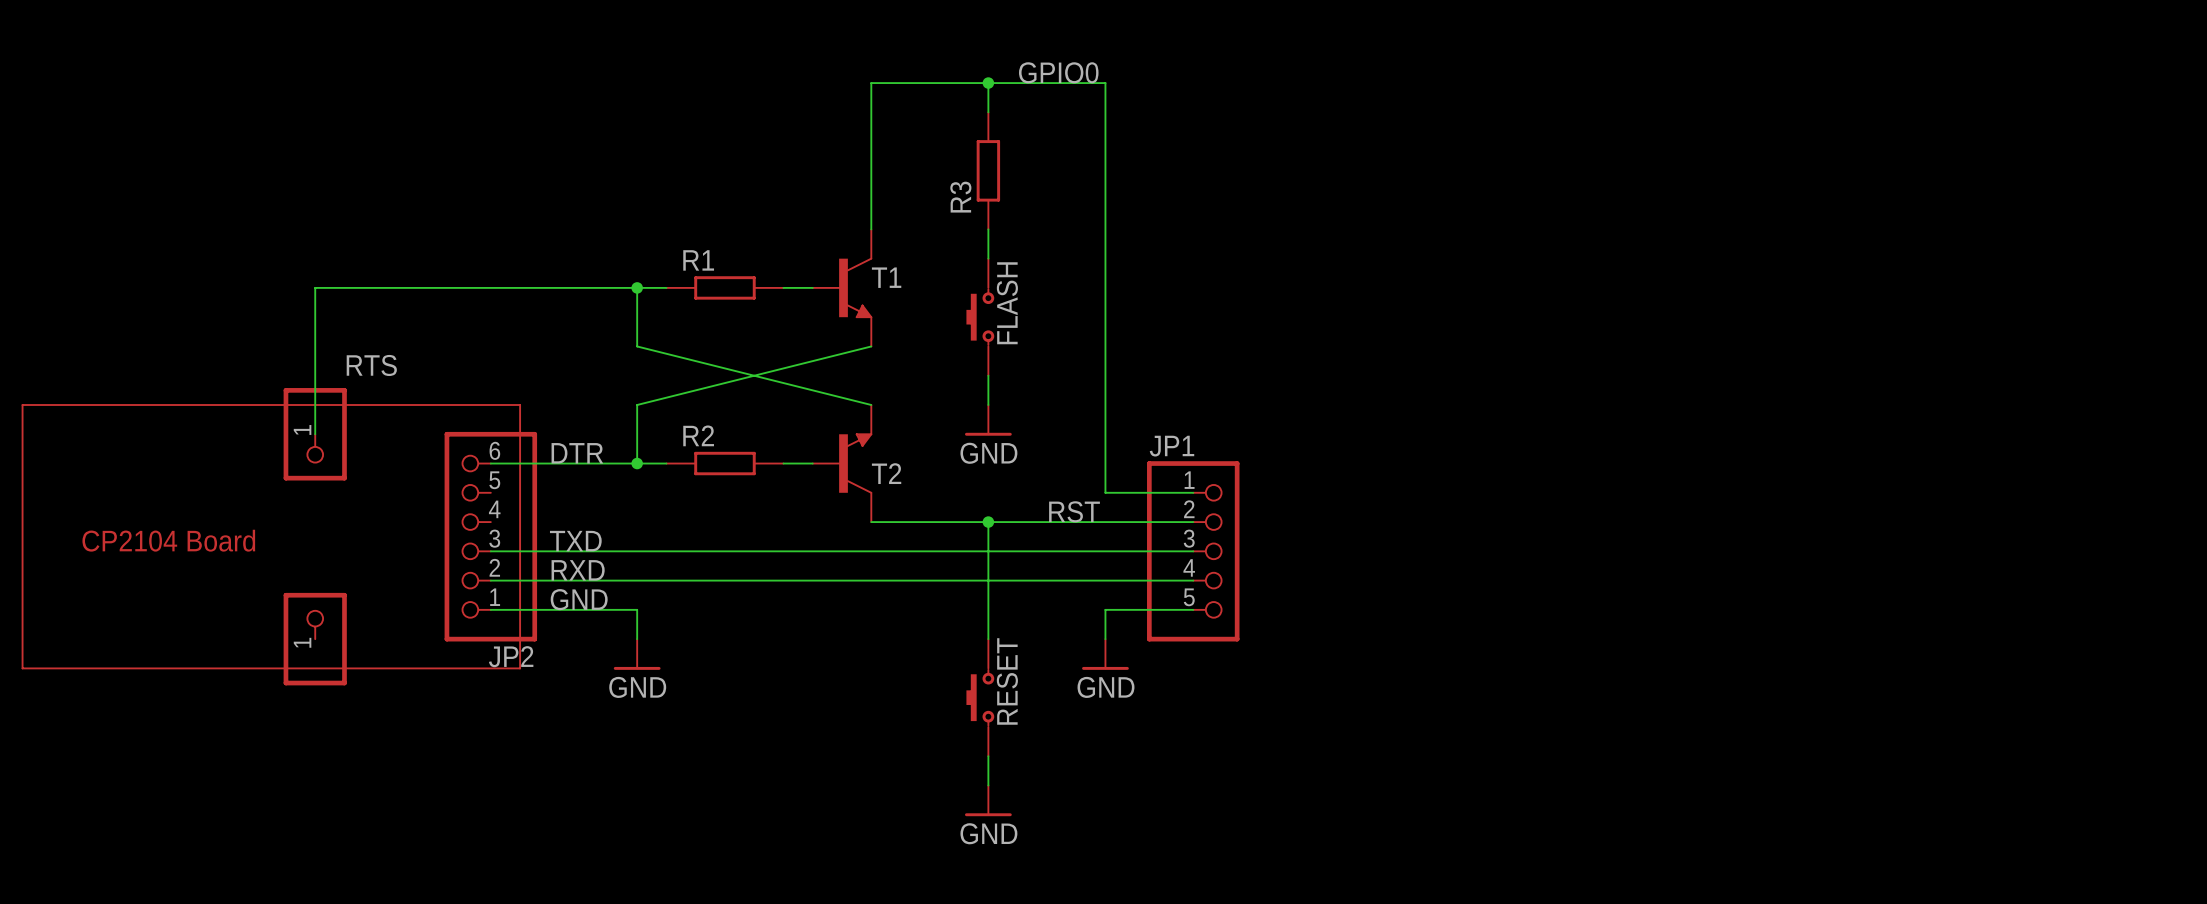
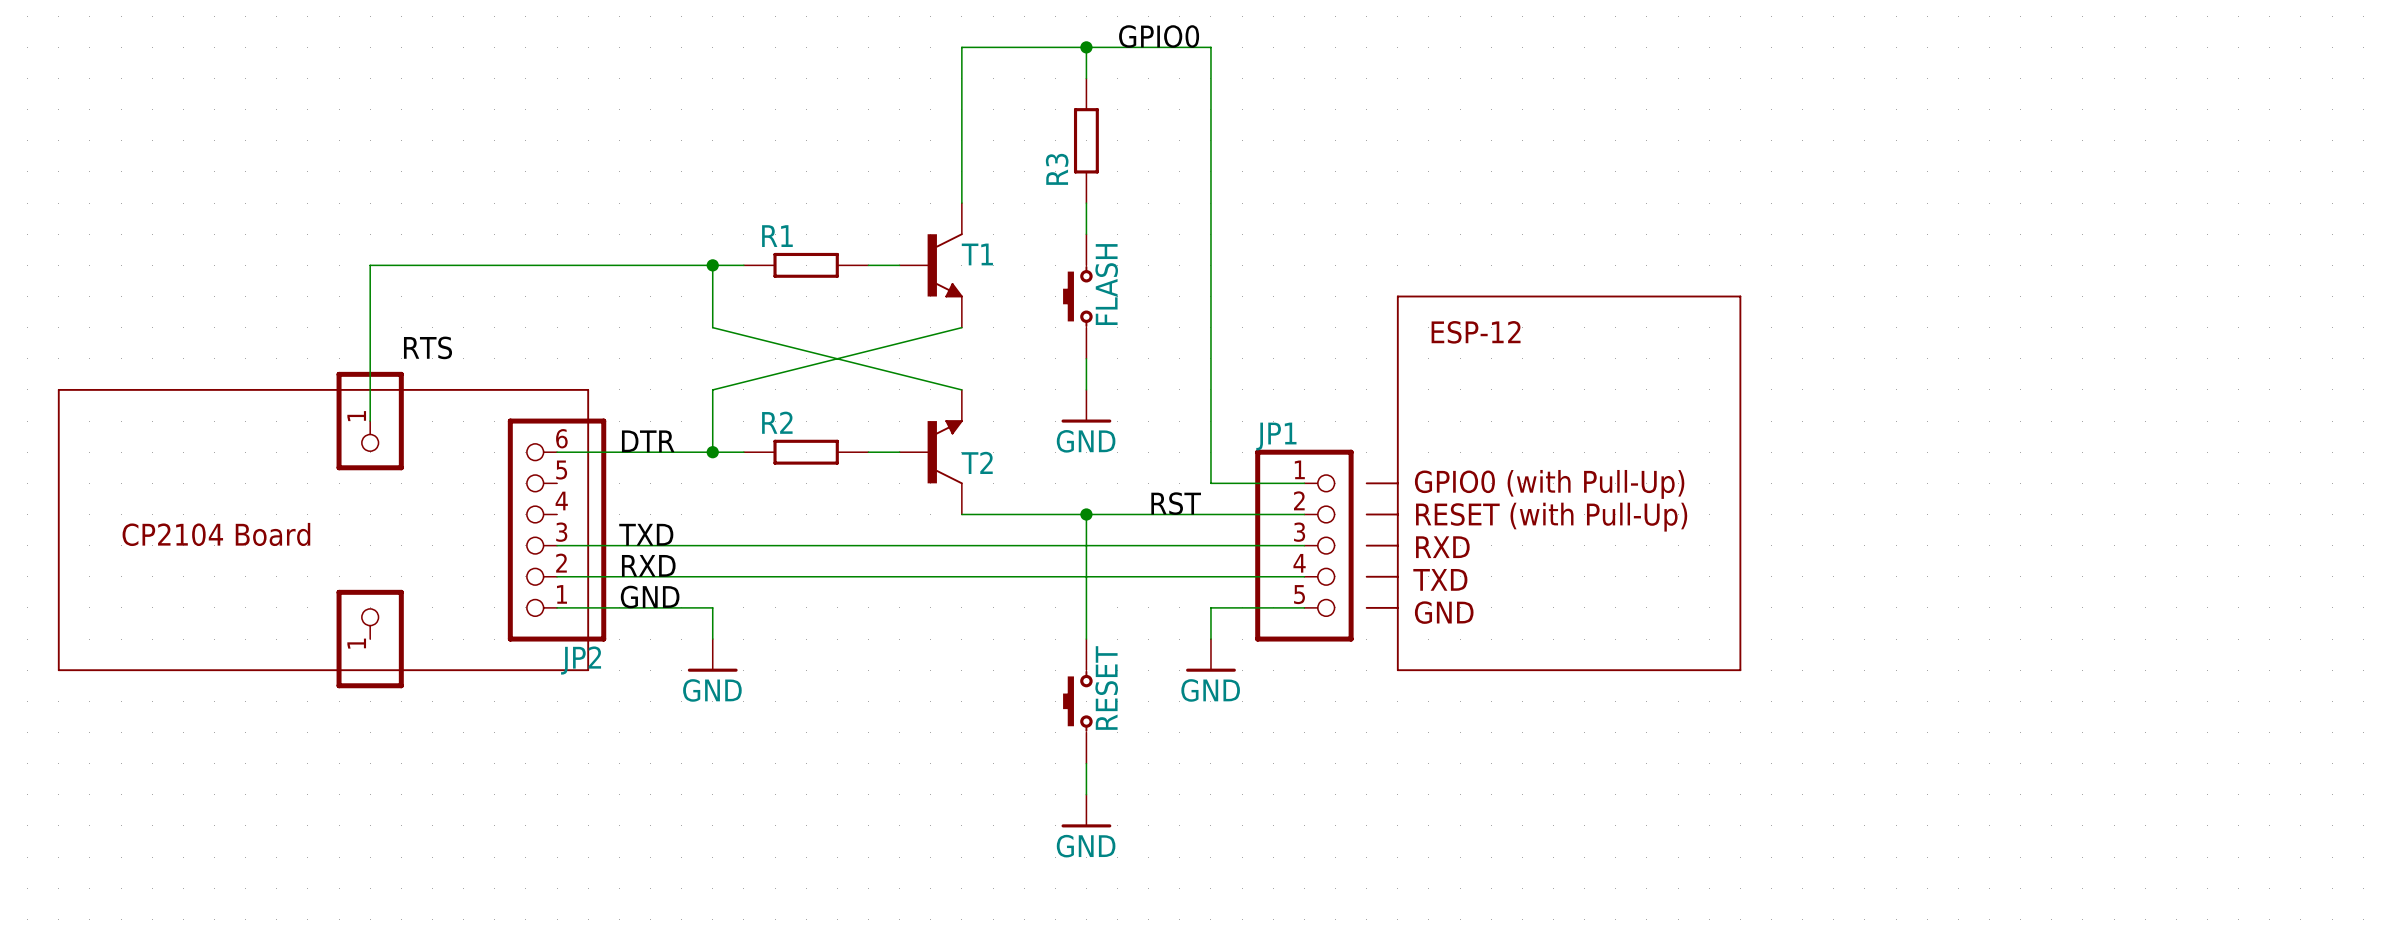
line: none -> (1397, 296) (1397, 670) (1740, 670) (1740, 296) (1397, 296)
text: none -> ESP-12 (1476, 332)
line: none -> (1366, 483) (1397, 483)
text: none -> GPIO0 (with Pull-Up) (1549, 484)
line: none -> (1366, 514) (1397, 514)
text: none -> RESET (with Pull-Up) (1551, 517)
line: none -> (1366, 545) (1397, 545)
text: none -> RXD (1442, 547)
line: none -> (1366, 576) (1397, 576)
text: none -> TXD (1440, 579)
line: none -> (1366, 607) (1397, 607)
text: none -> GND (1444, 612)

